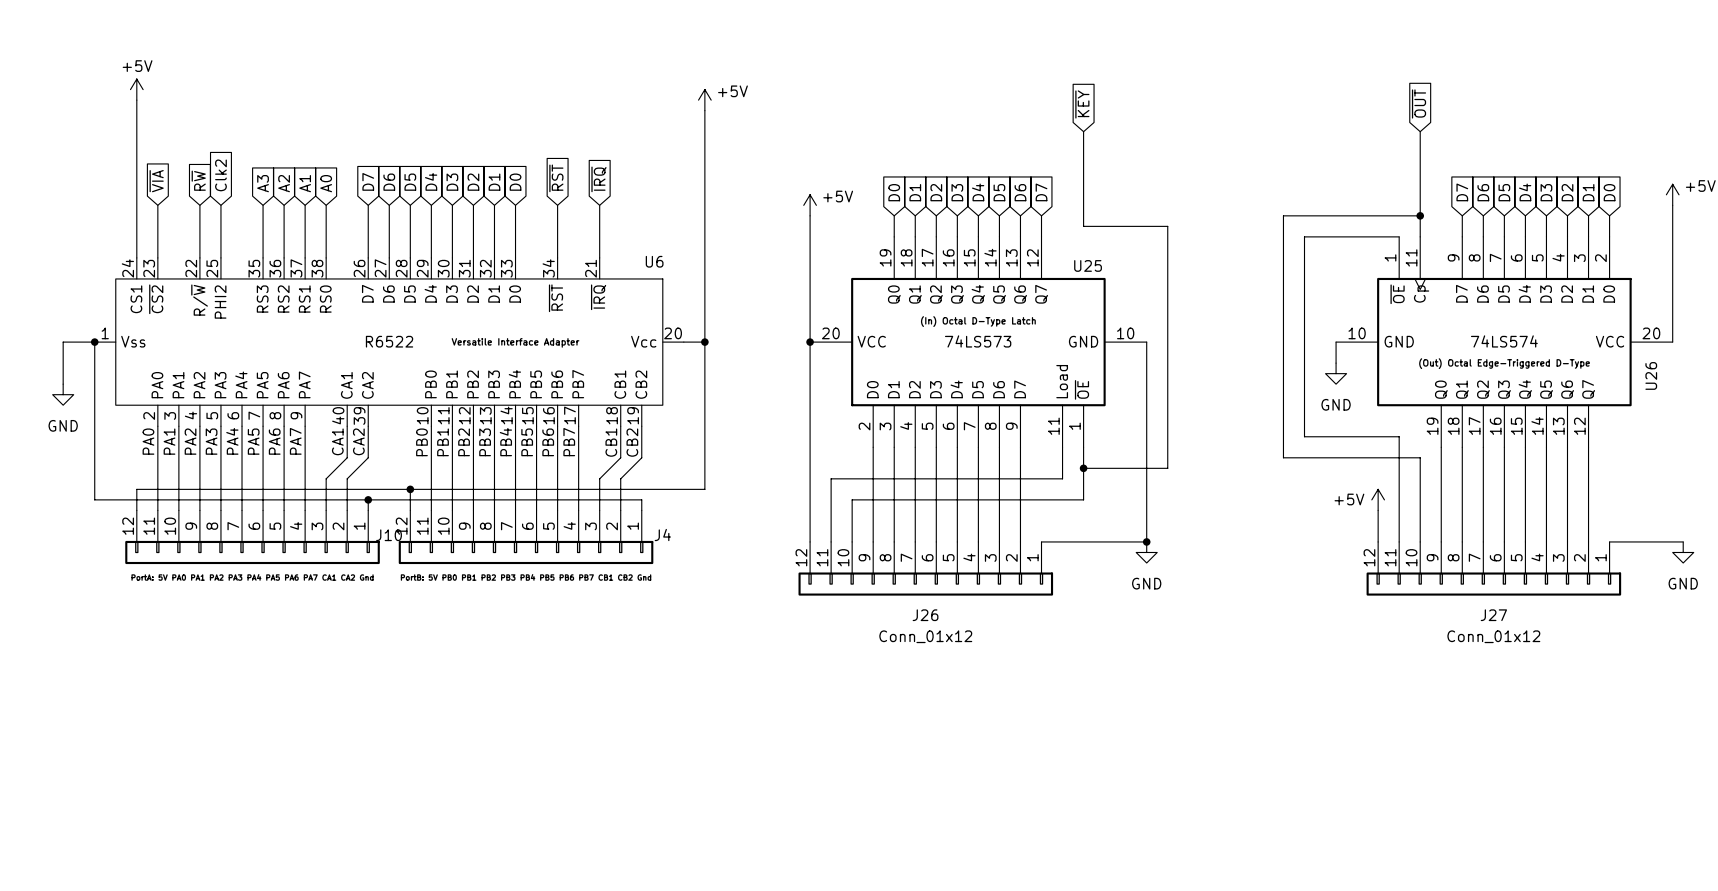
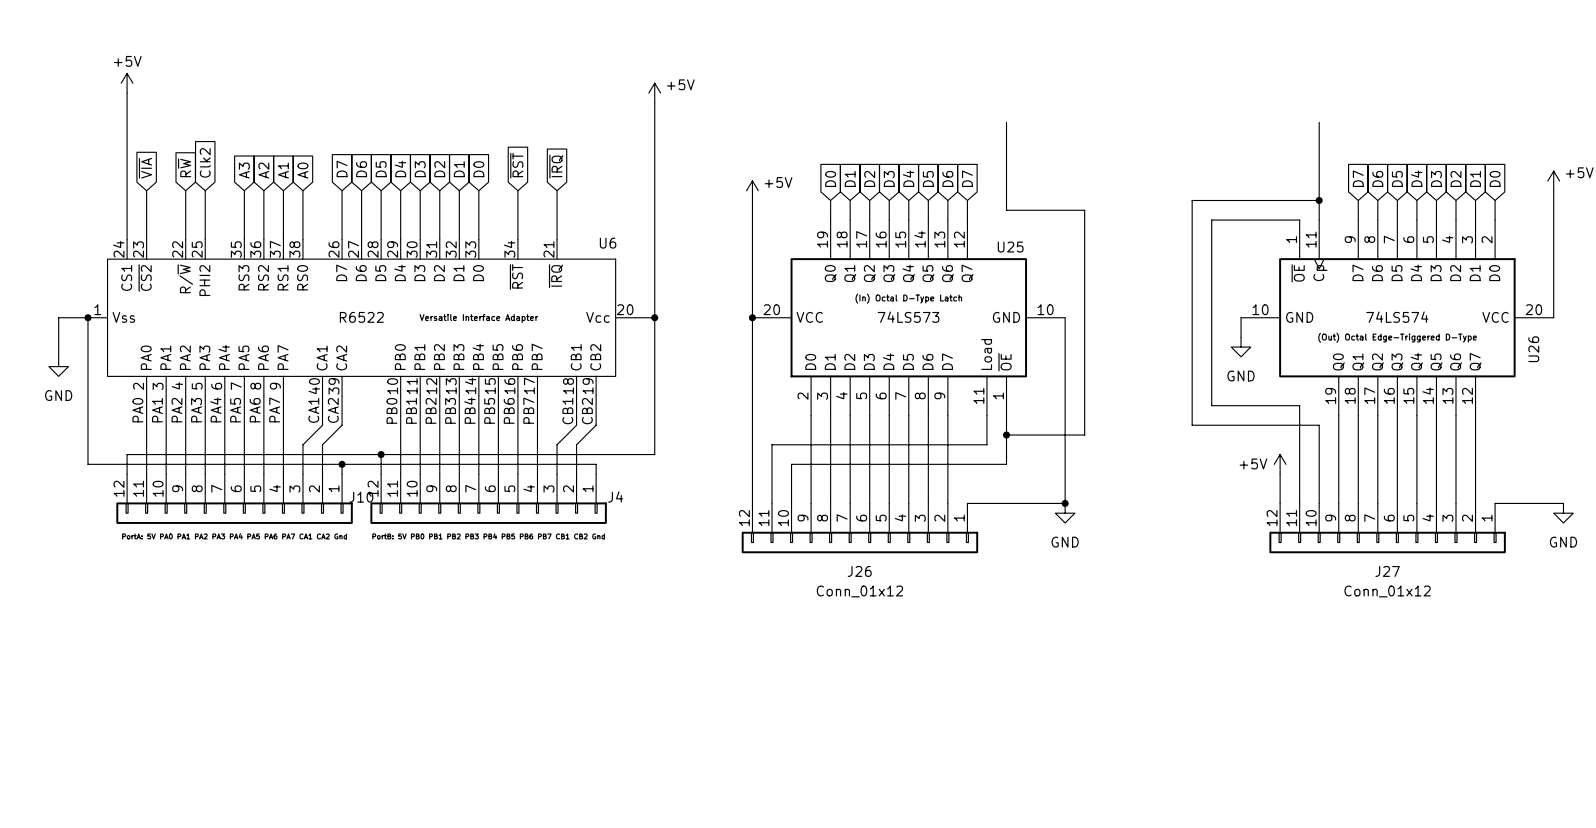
global label: ~{OUT} (1419, 103) -> none
global label: ~{KEY} (1082, 104) -> none

